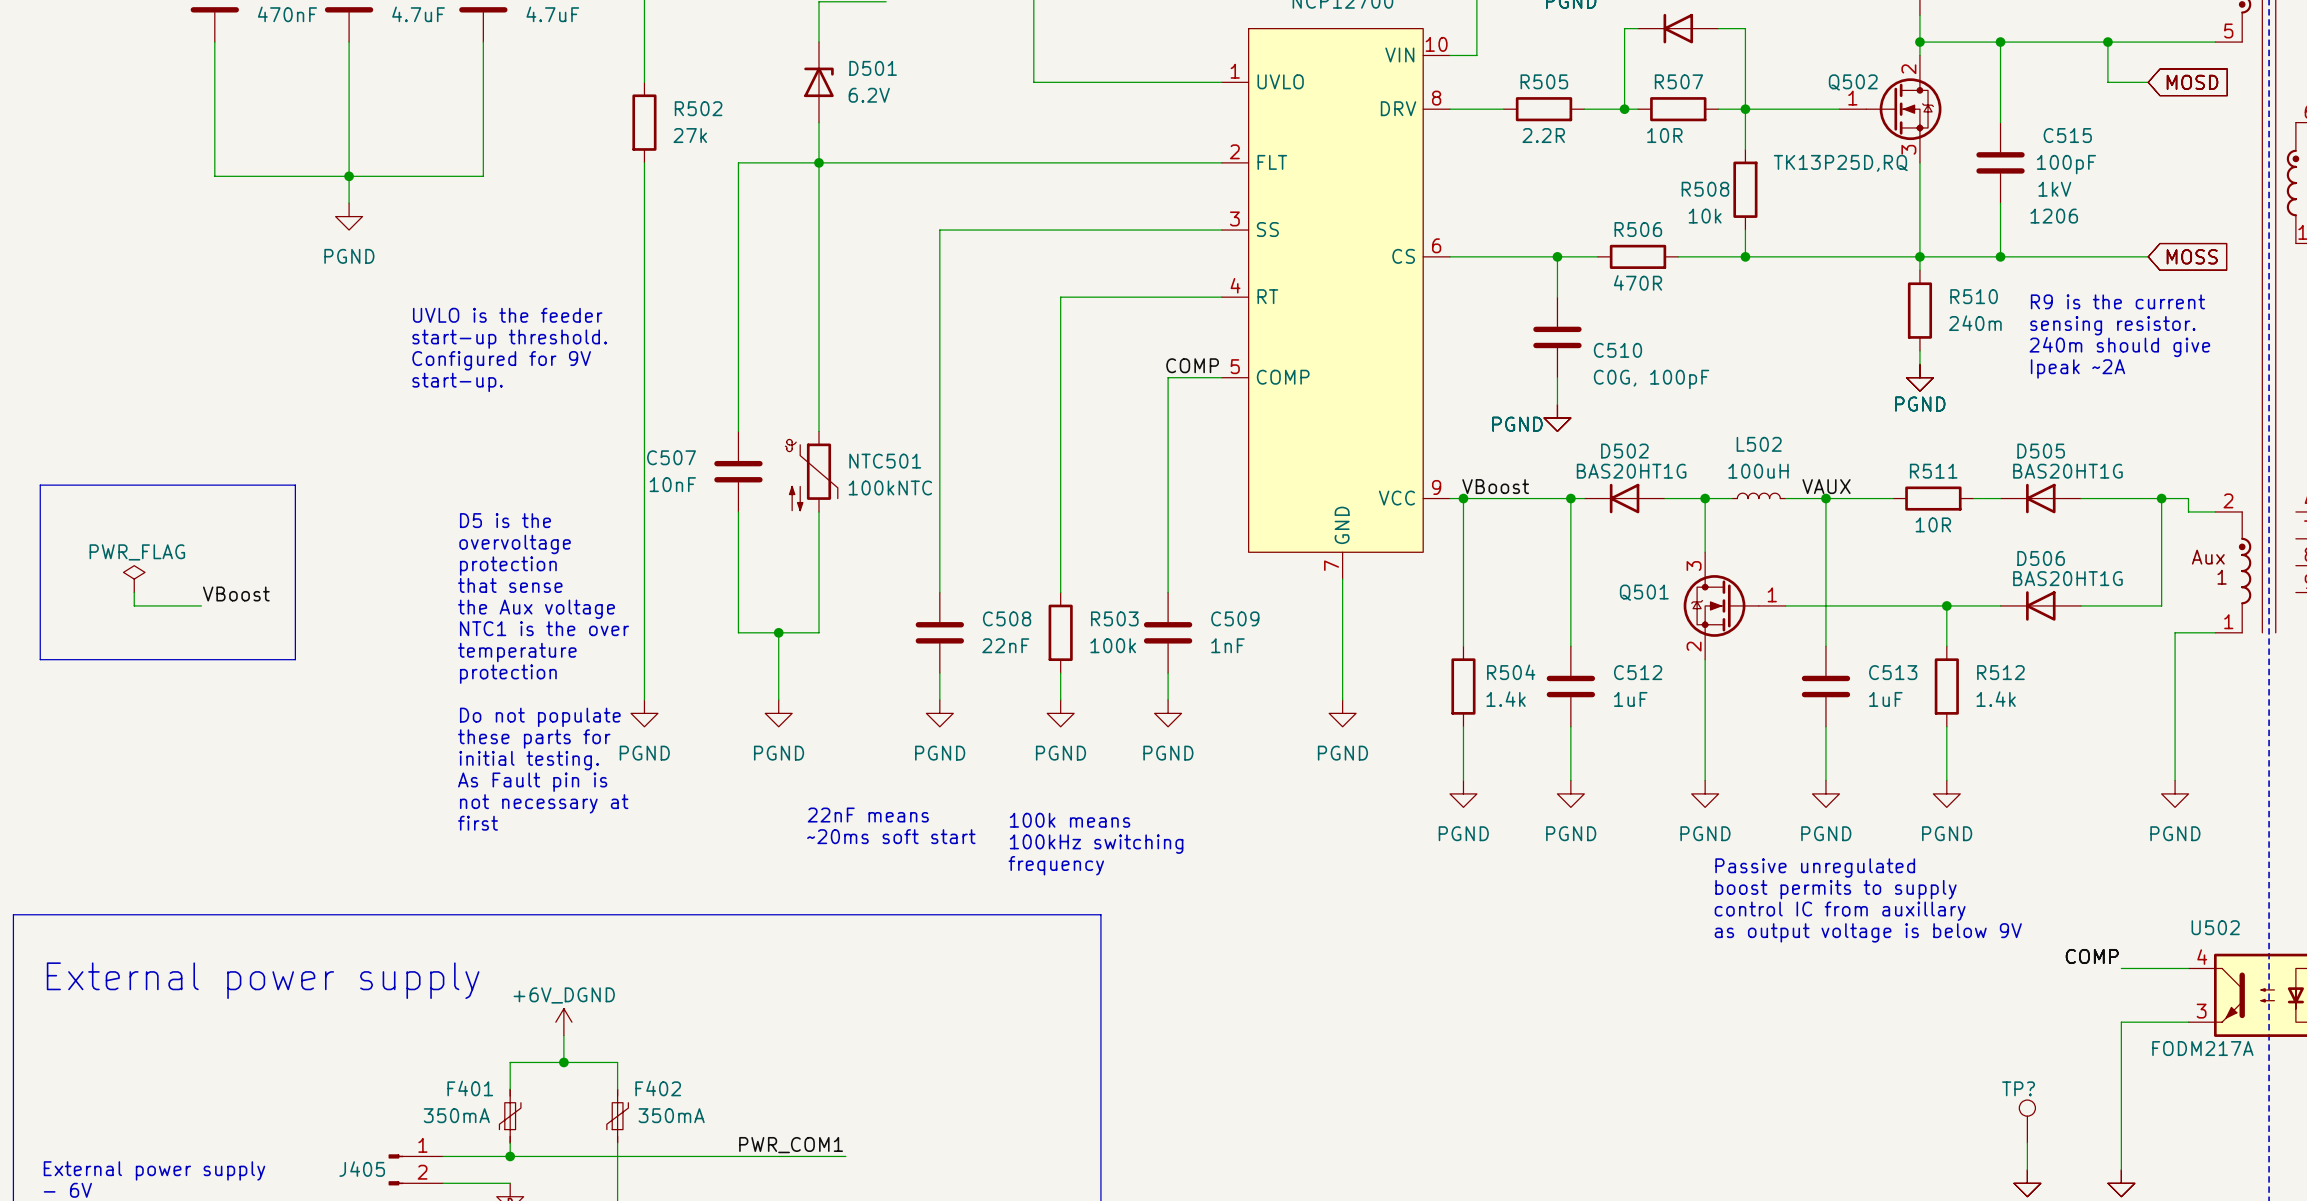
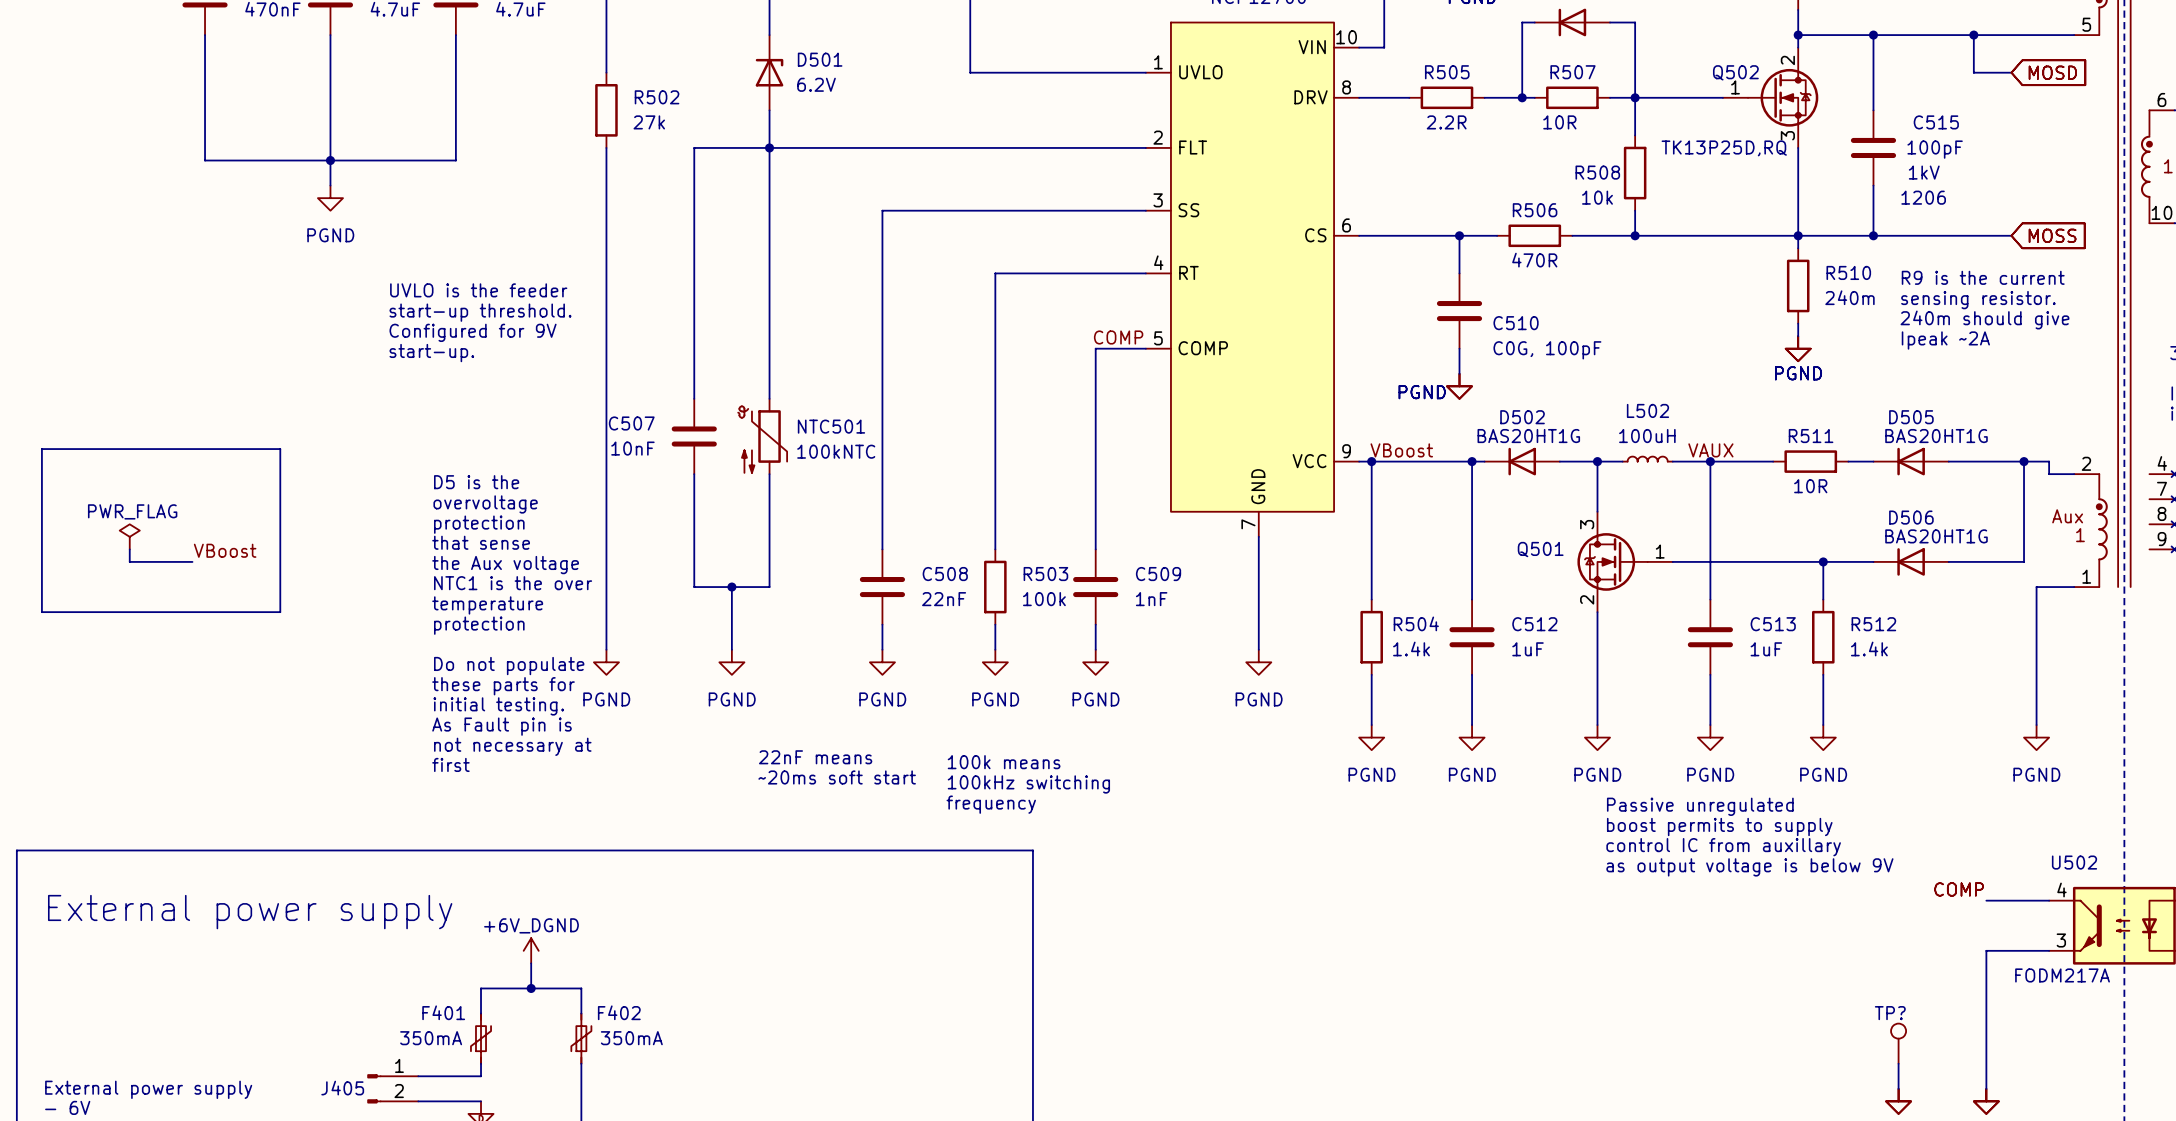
label: PWR_COM1 (791, 1145) -> none
wire: (510, 1156) (845, 1156) -> none
junction: (510, 1156) -> none

